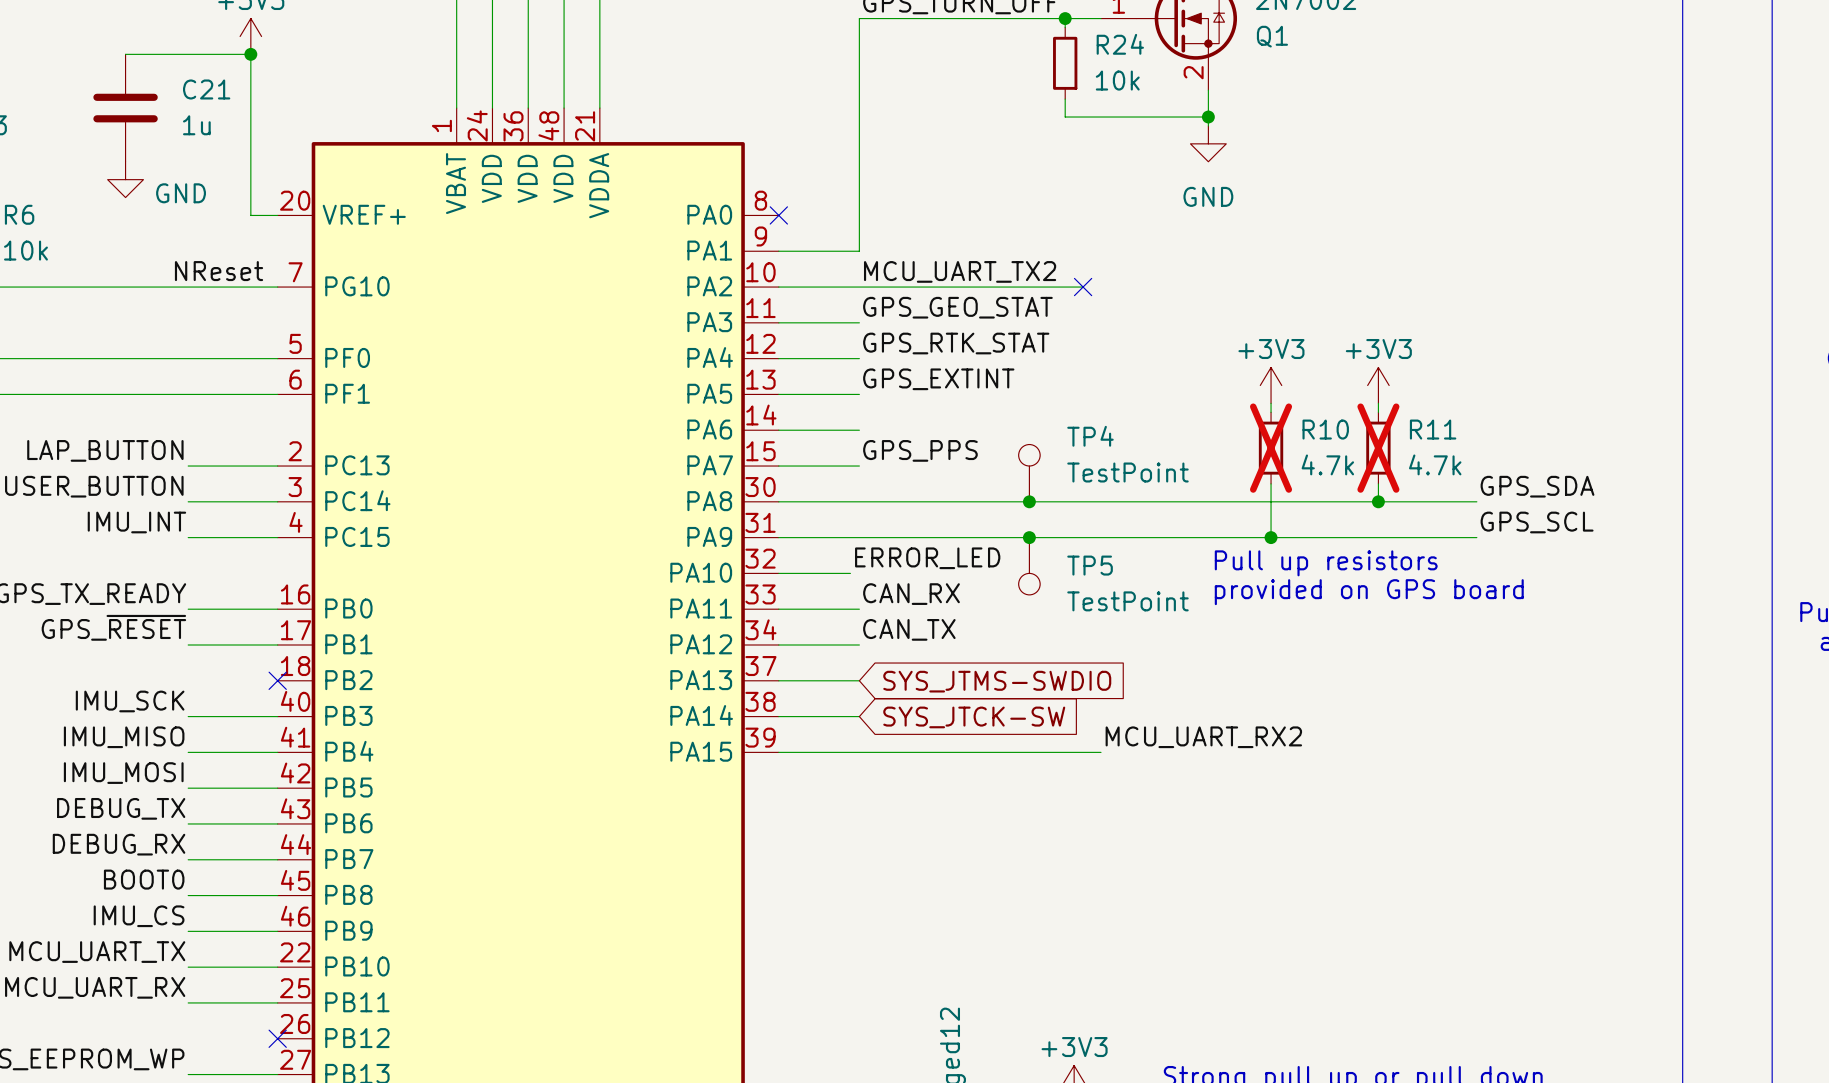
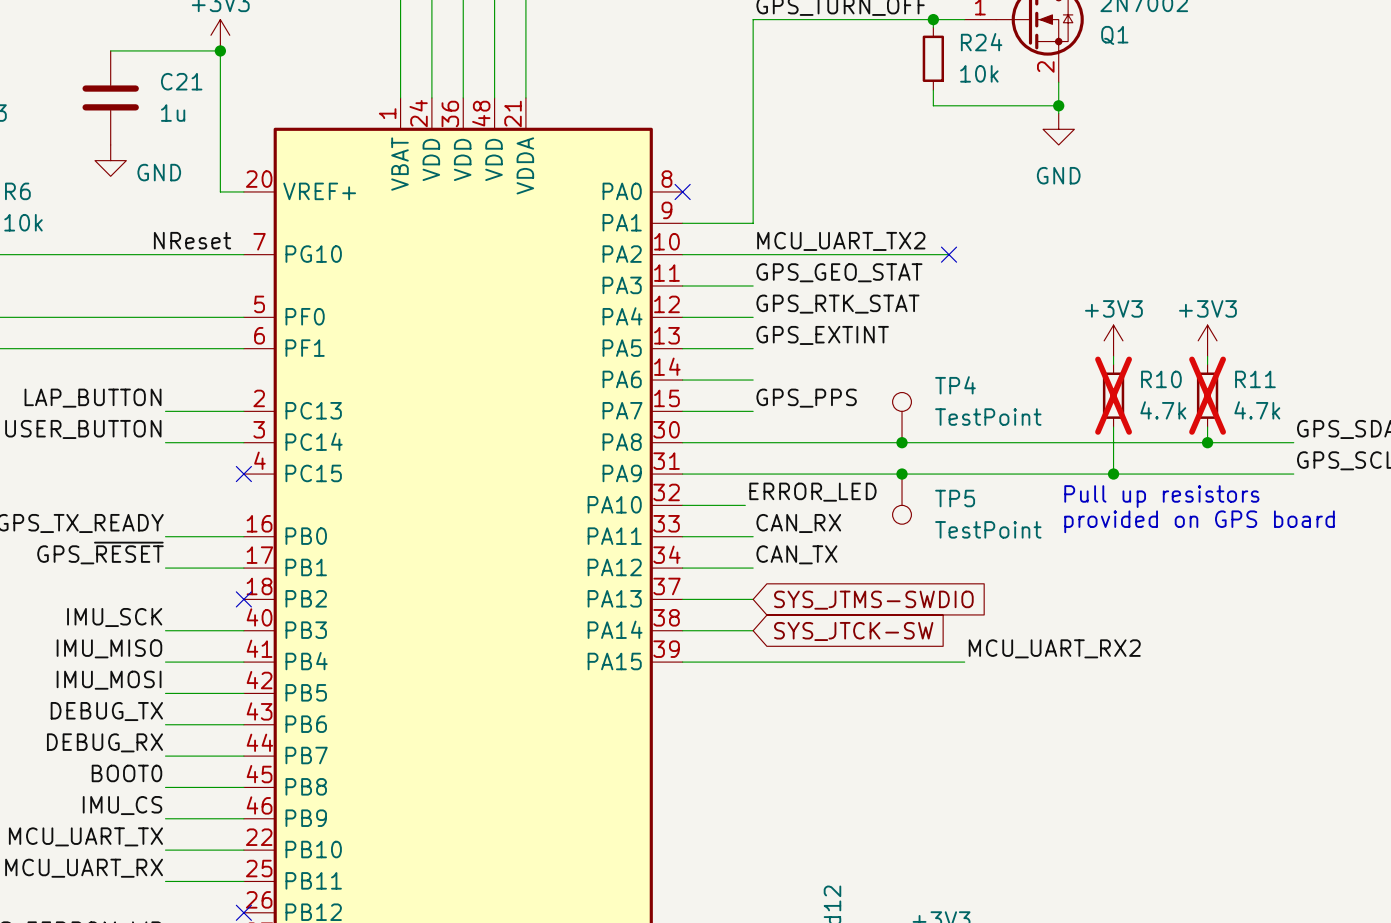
label: IMU_INT (136, 522) -> none
wire: (188, 537) (277, 537) -> none
no-connect mark: none -> (243, 474)

